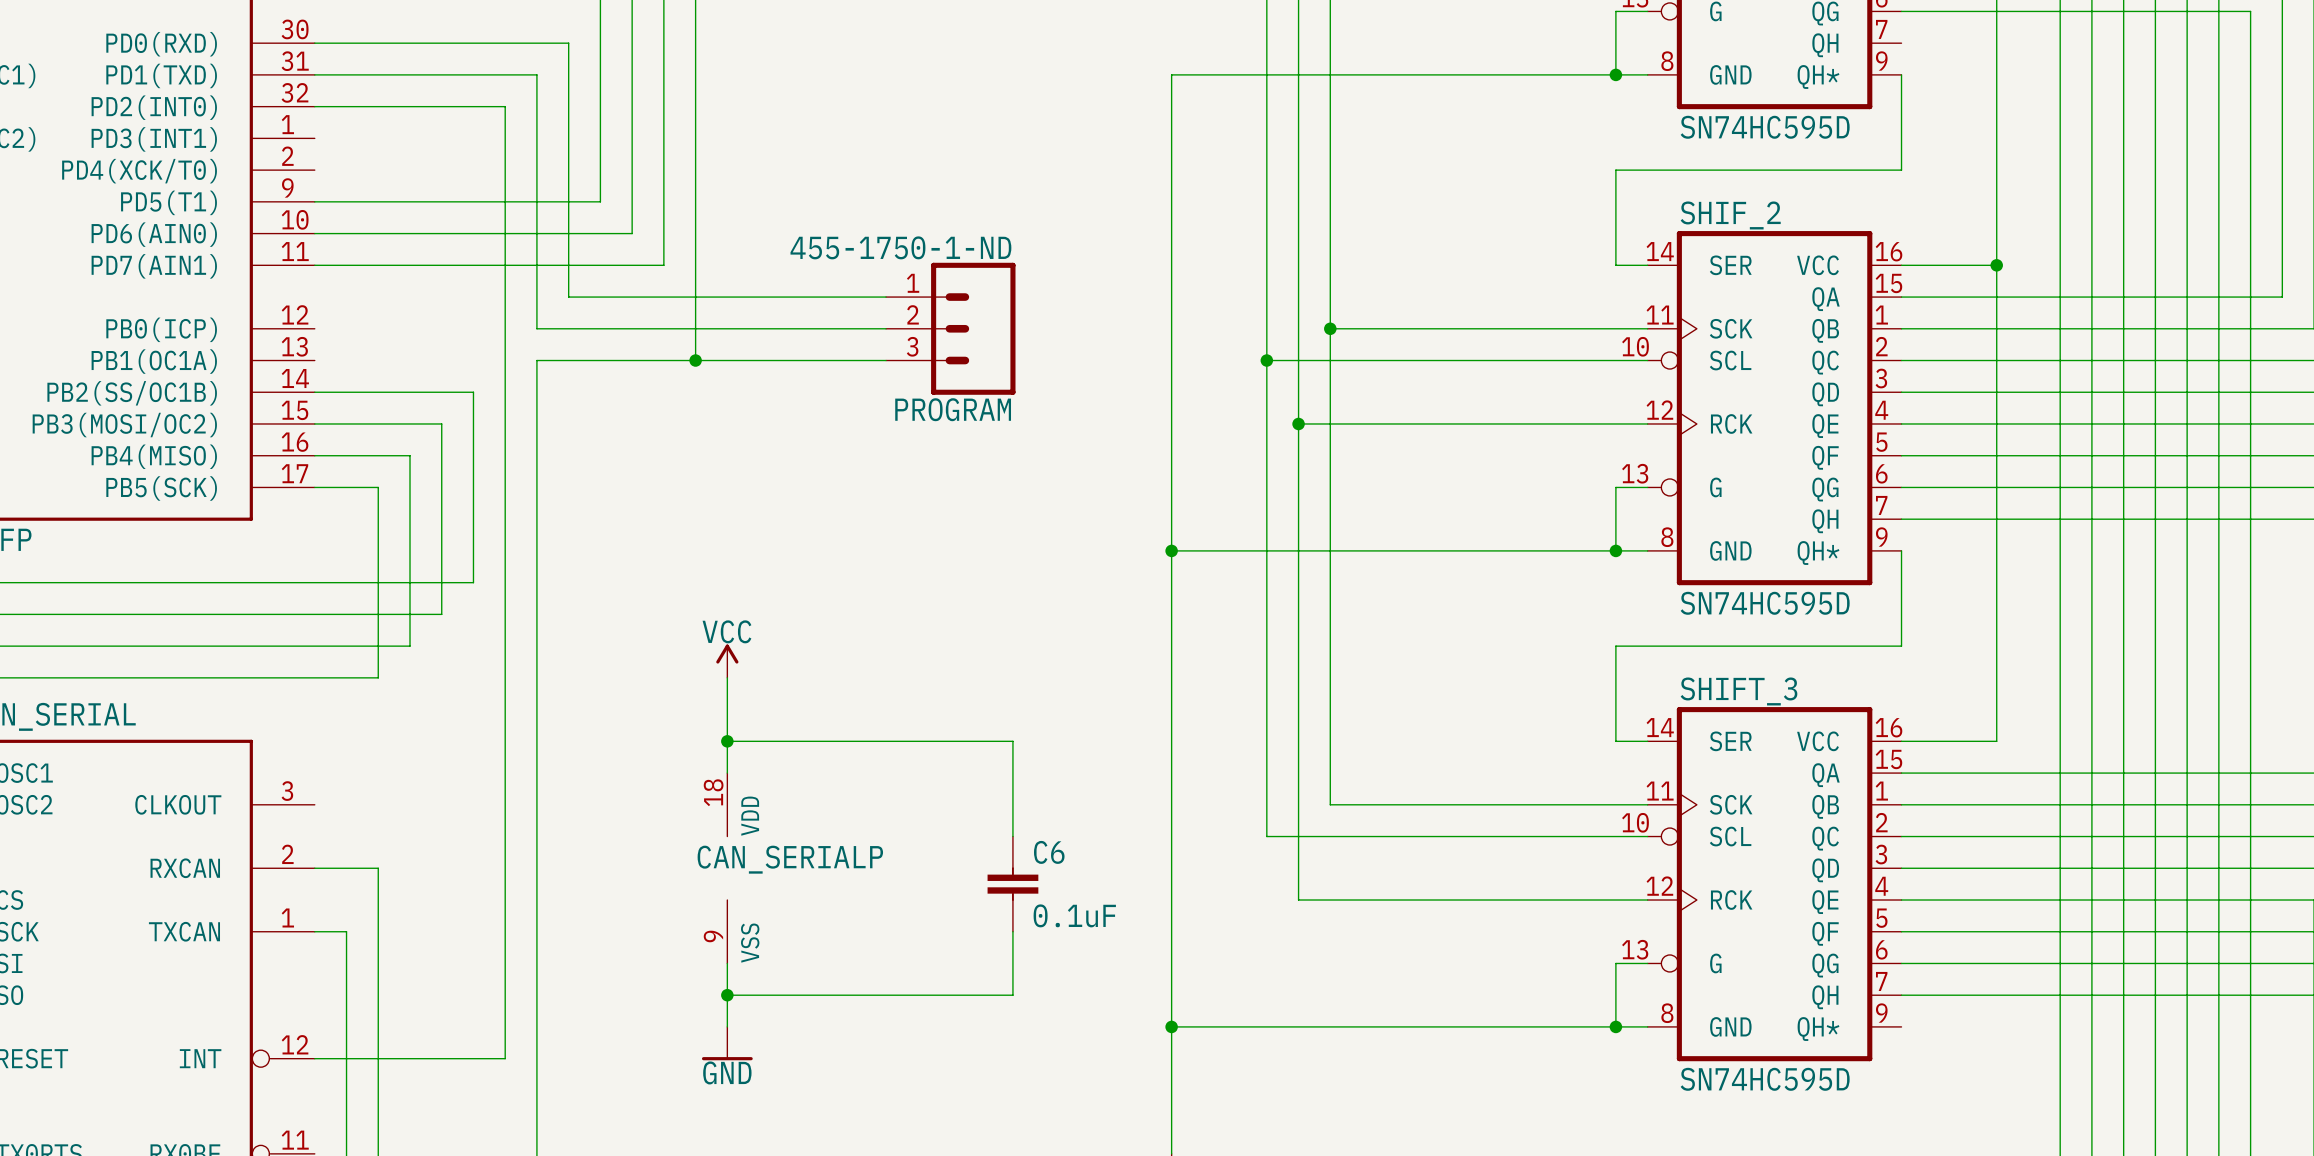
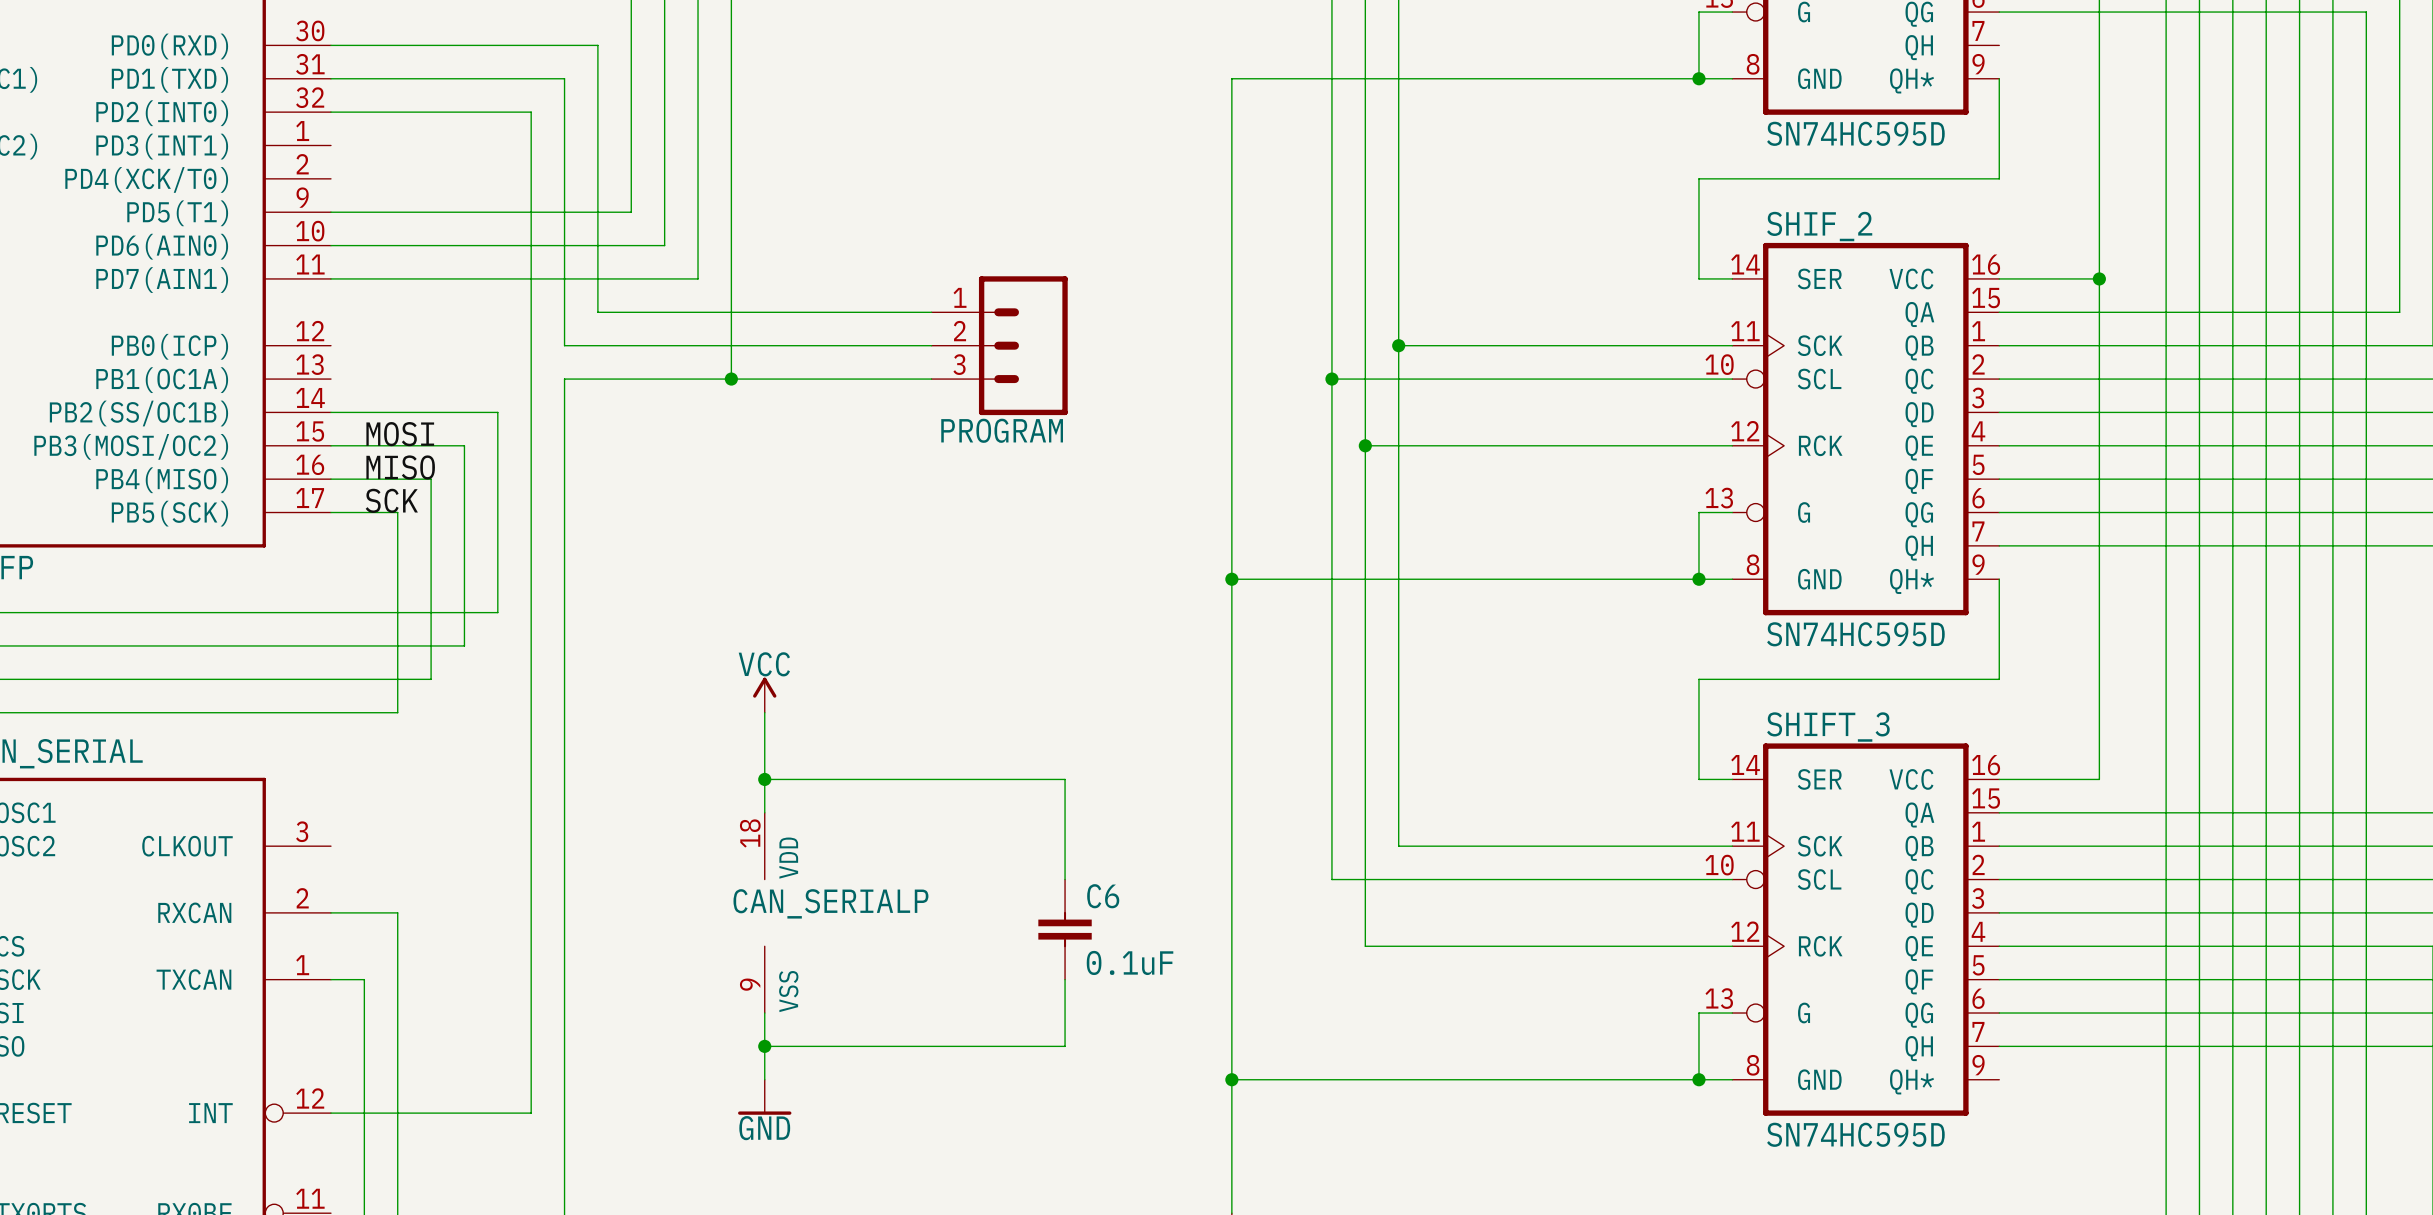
PROGRAM value: 455-1750-1-ND (900, 247) -> none
label: none -> MOSI (400, 434)
label: none -> MISO (400, 467)
label: none -> SCK (391, 500)

